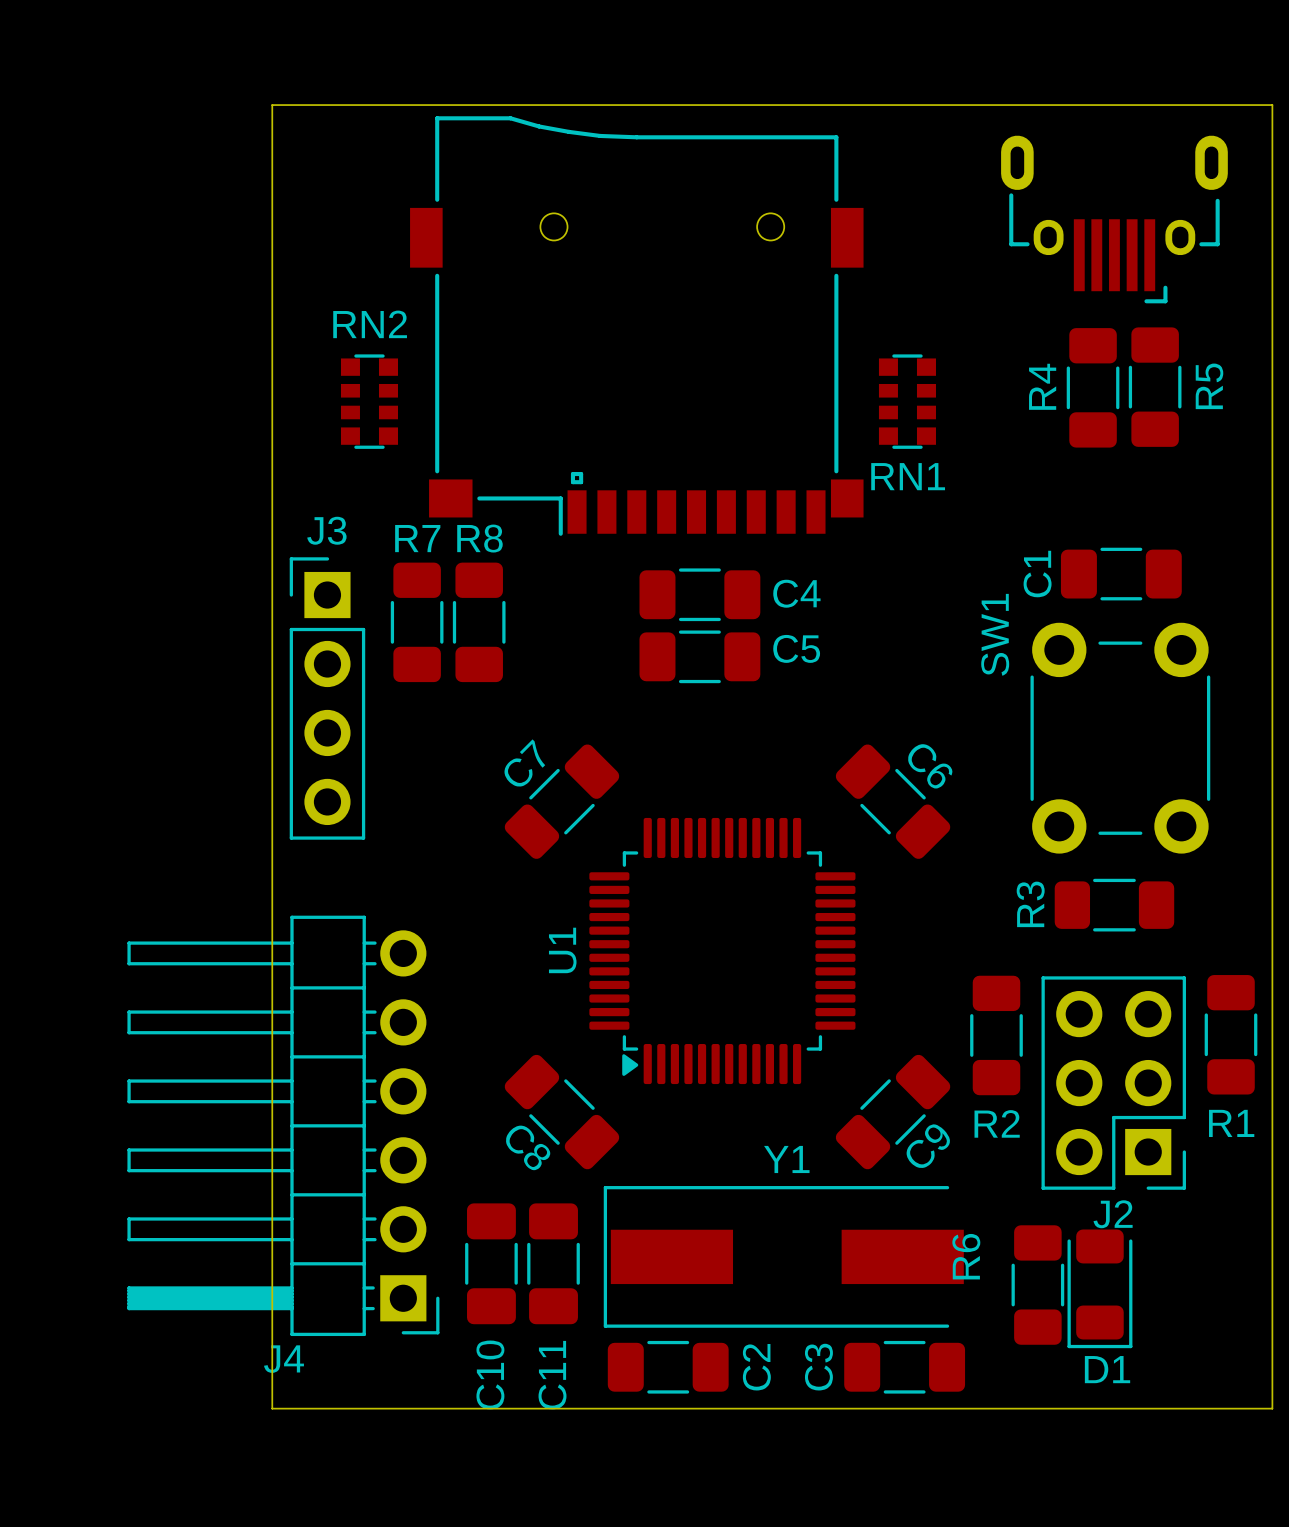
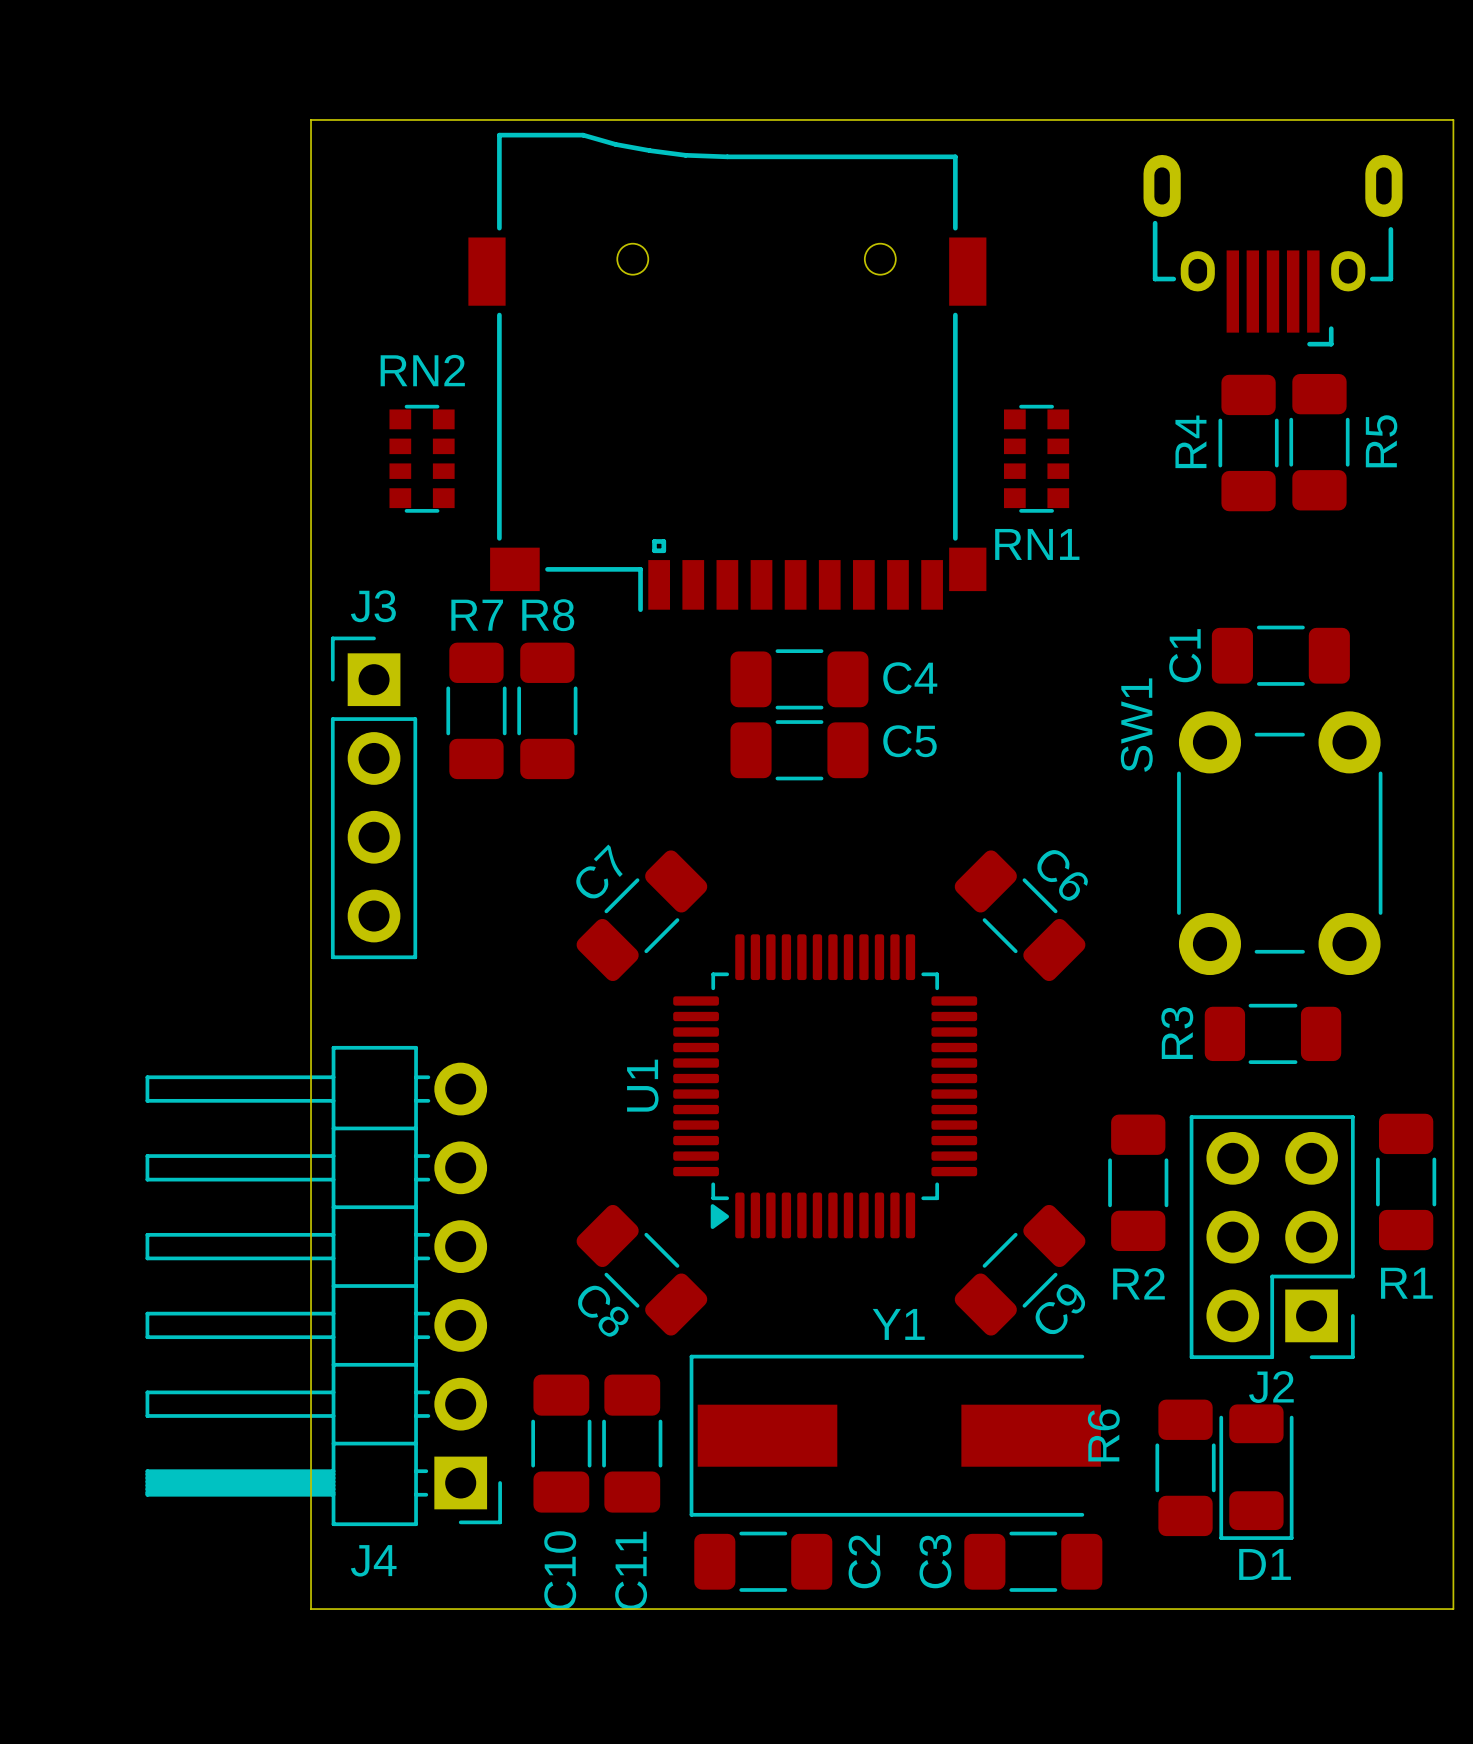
J4 name position: J4 (283, 1359) -> J4 (373, 1560)

